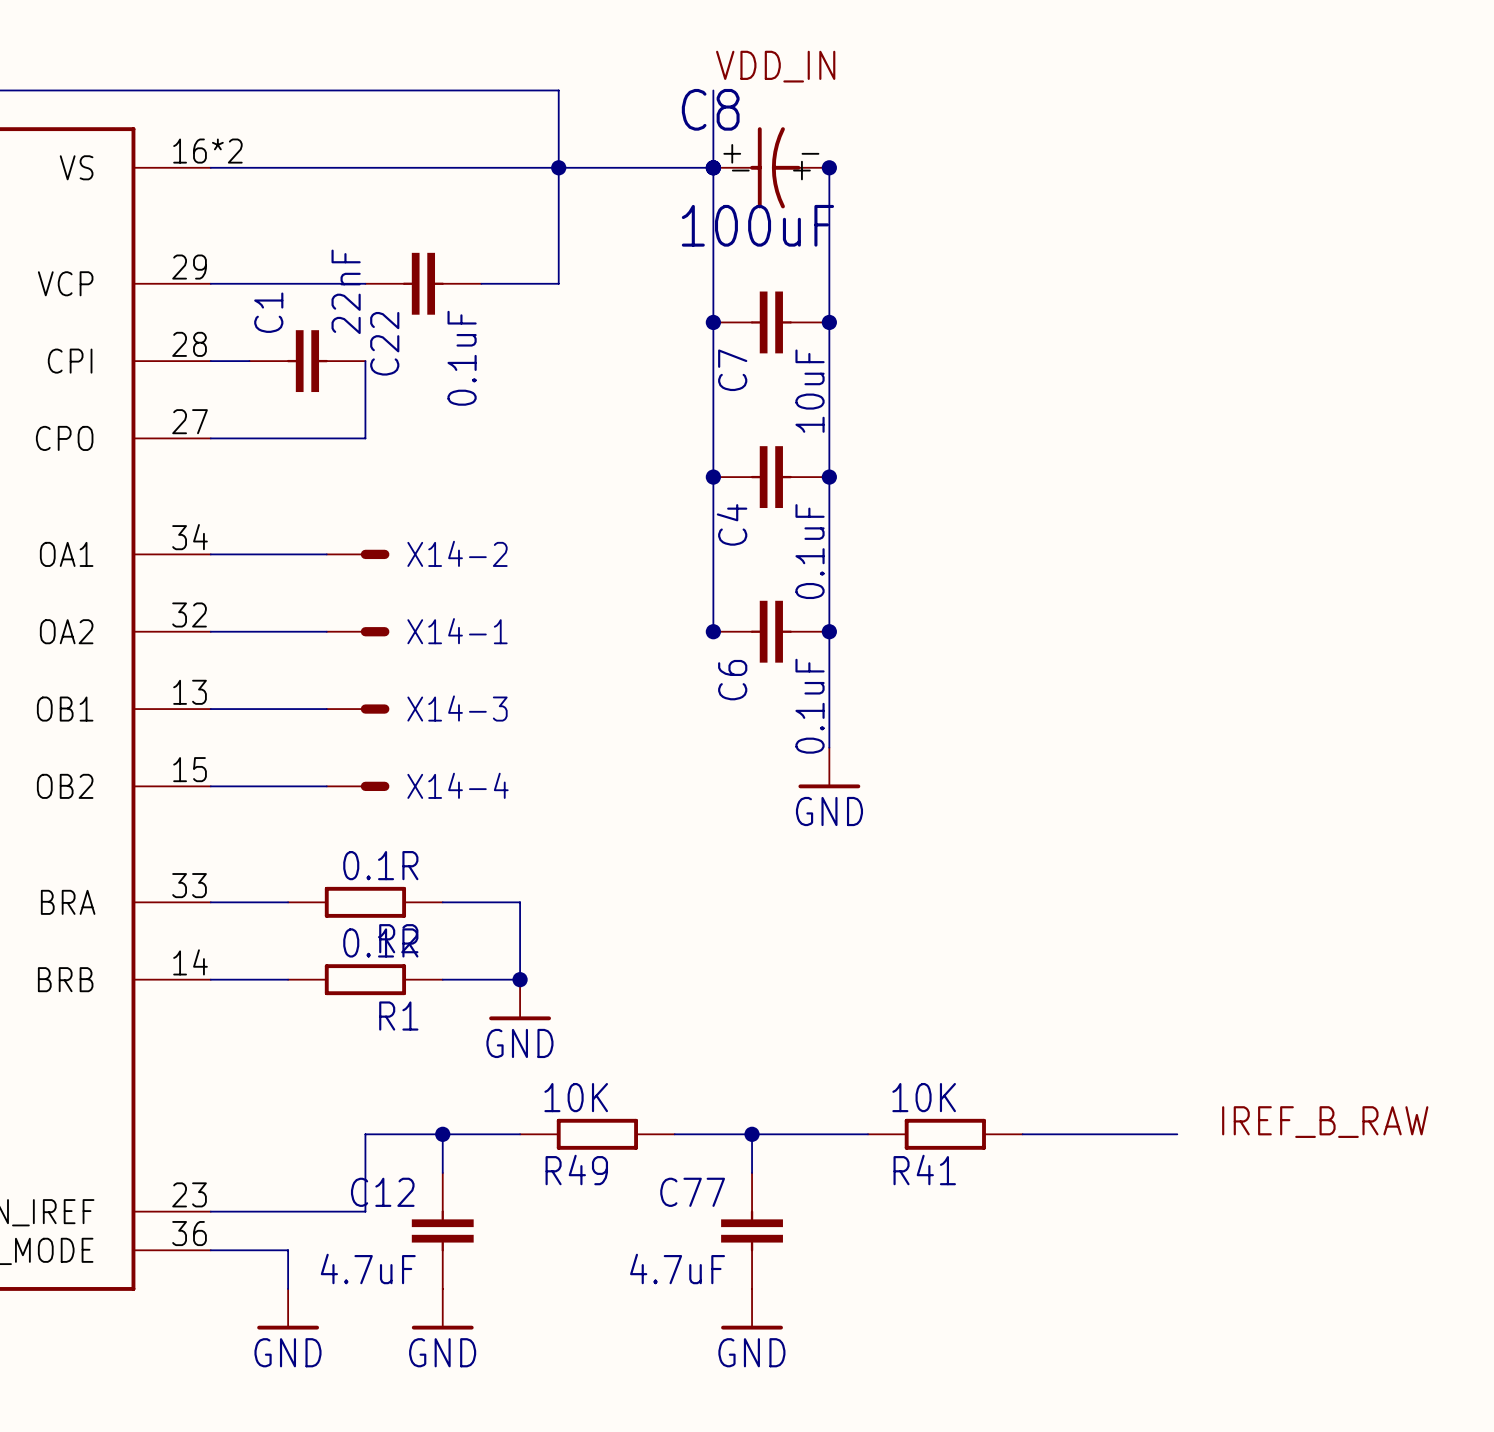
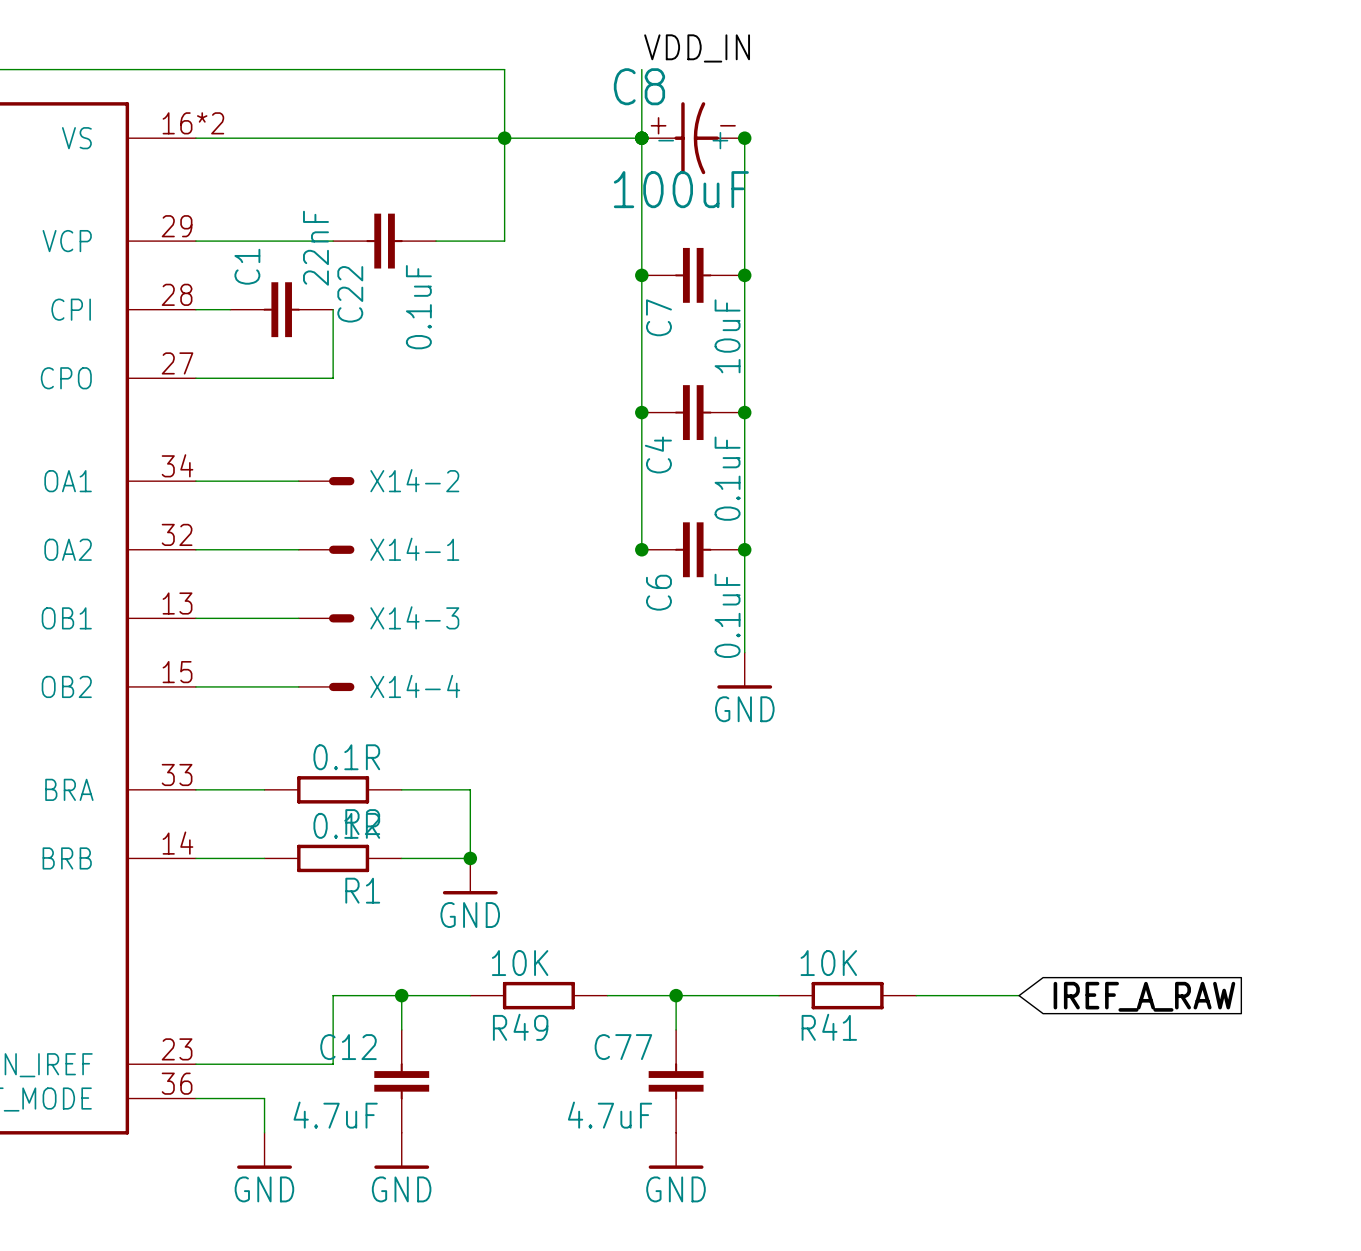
label: IREF_B_RAW (1325, 1122) -> none
wire: (1138, 1134) (1177, 1134) -> none
global label: none -> IREF_A_RAW (1144, 996)

